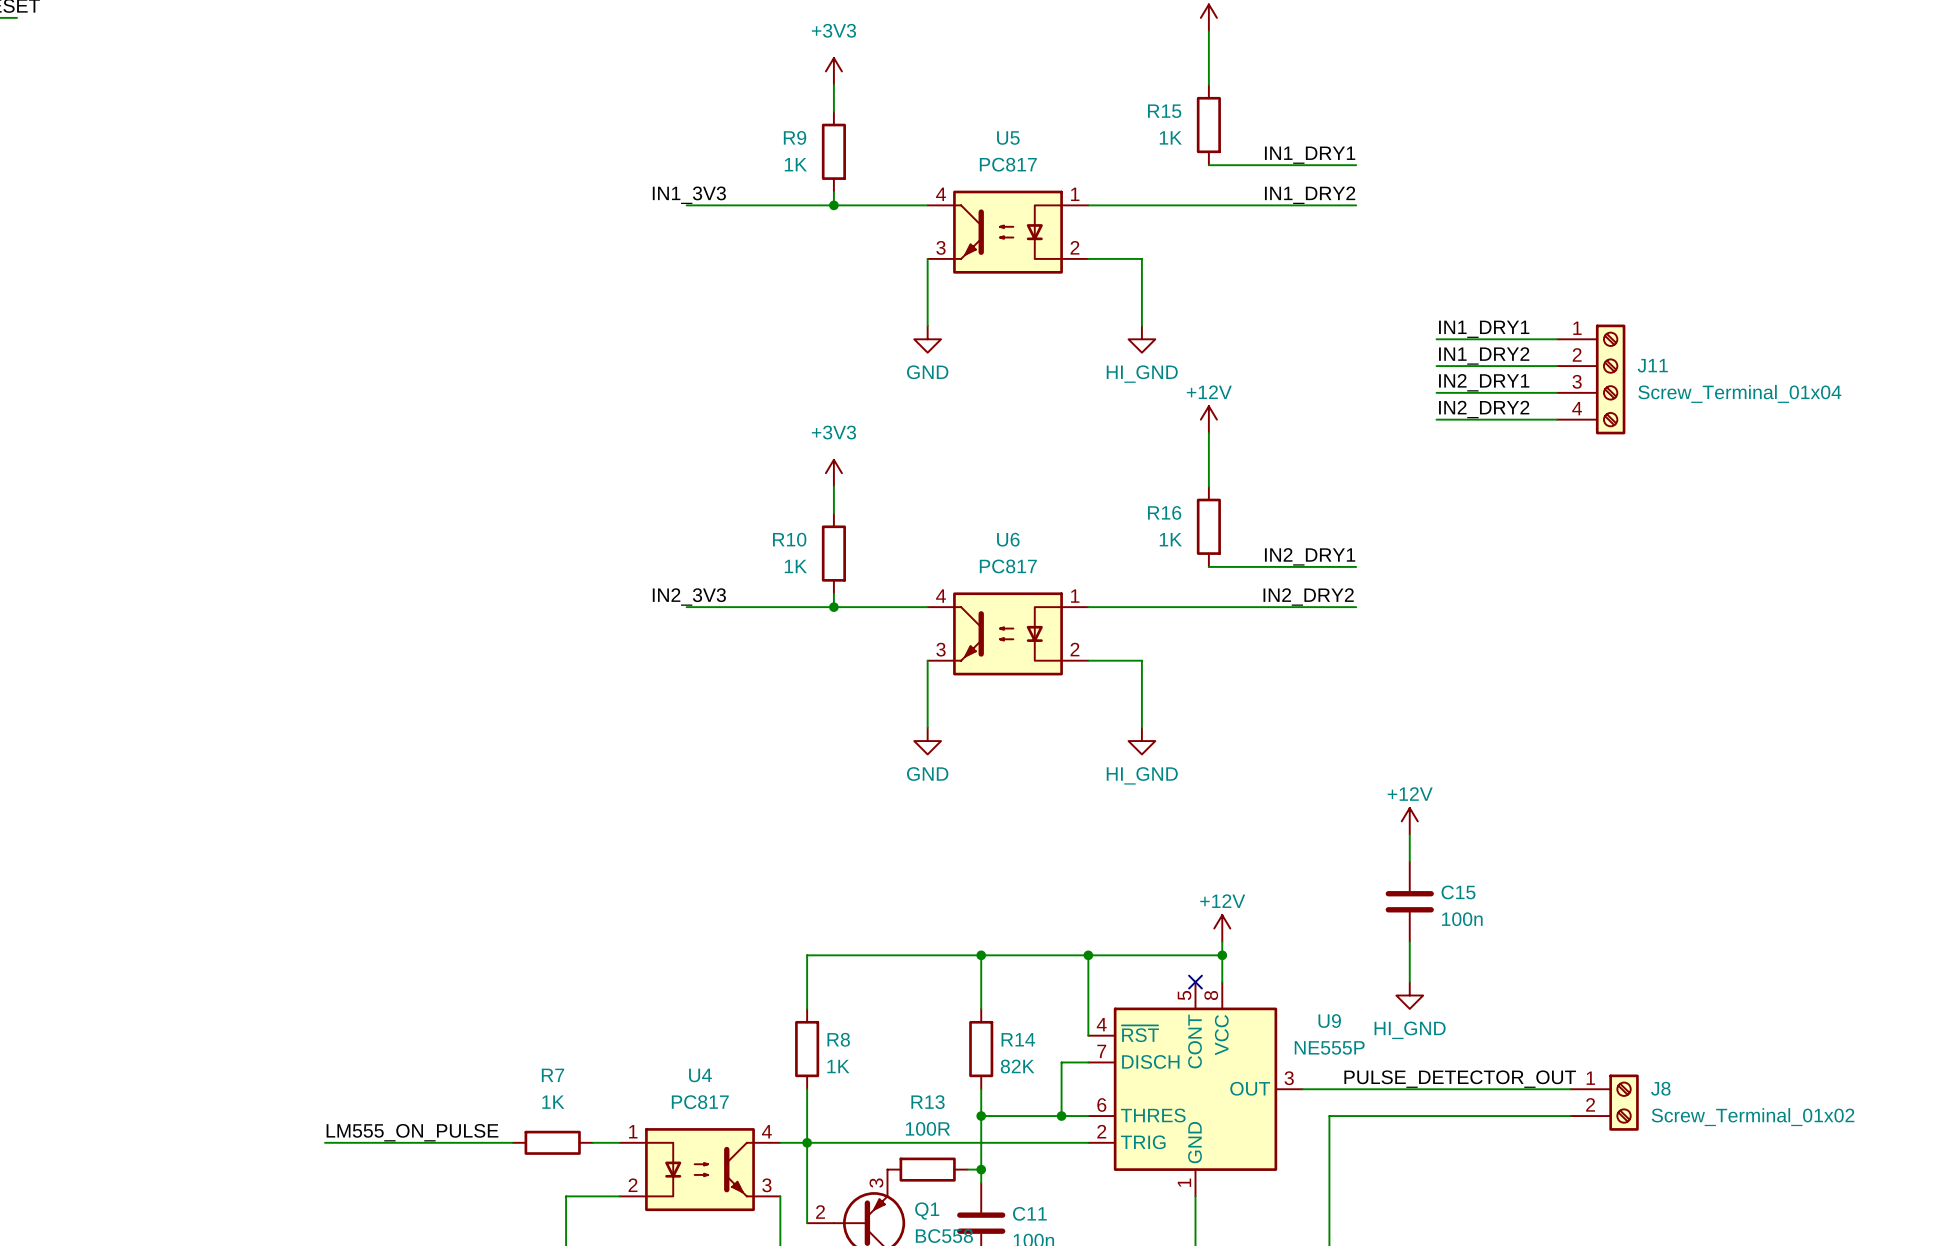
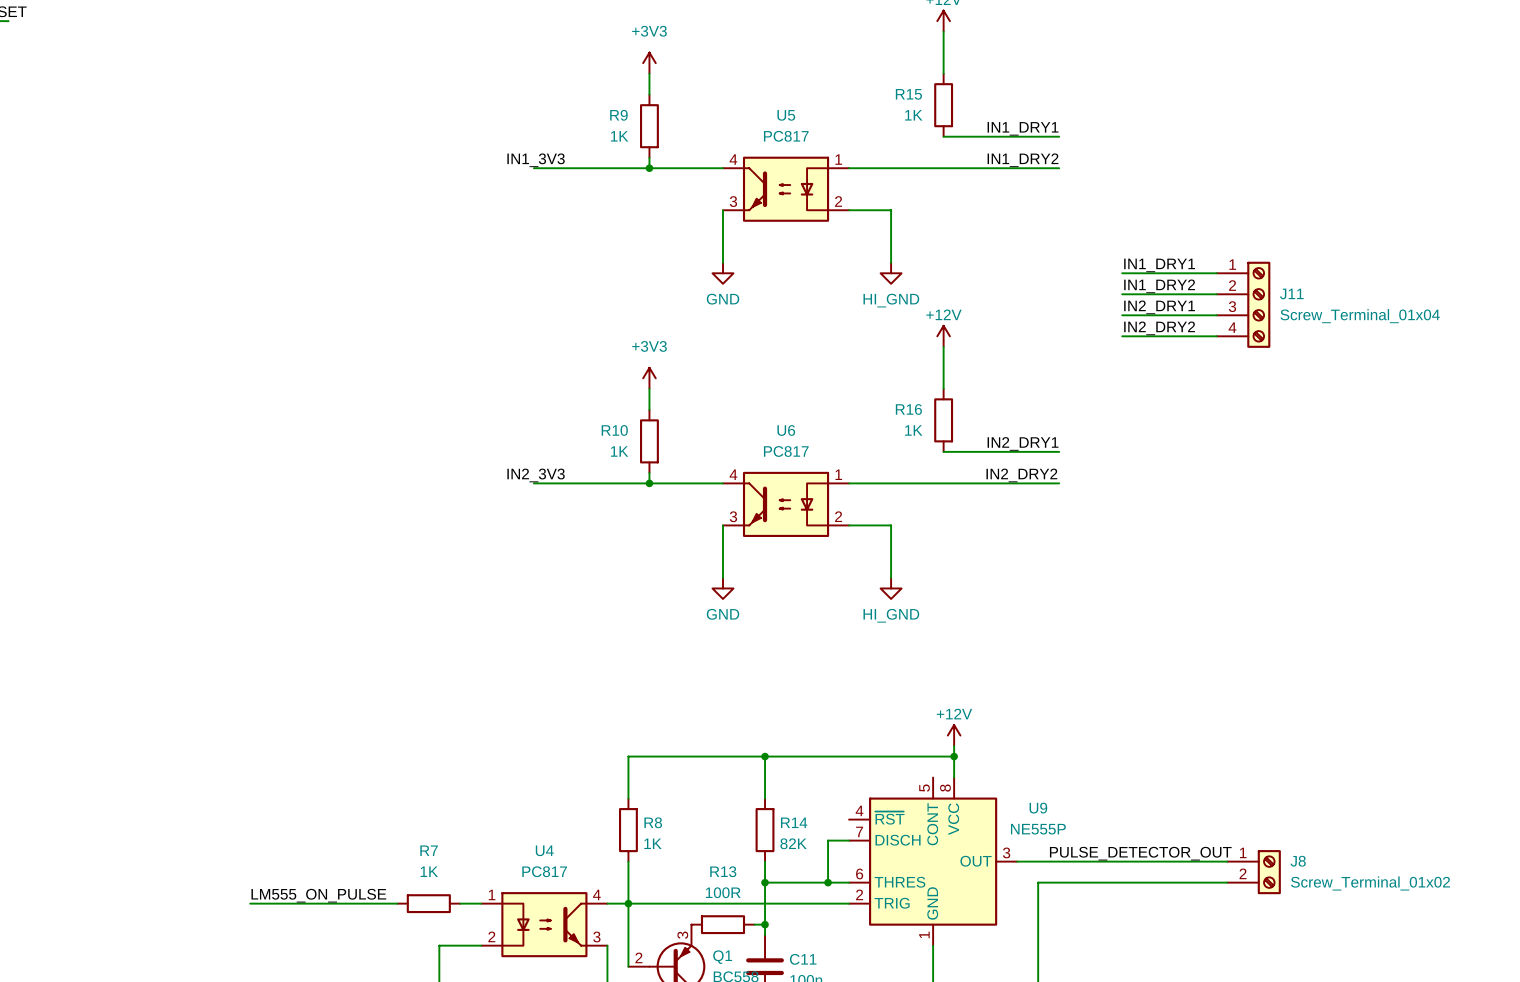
power symbol: +12V (1409, 821) -> none
wire: (1409, 834) (1409, 861) -> none
C15: 100n (1409, 901) -> none
wire: (1409, 941) (1409, 982) -> none
wire: (1088, 955) (1088, 1035) -> none
junction: (1088, 955) -> none
no-connect mark: (1195, 982) -> none
power symbol: HI_GND (1409, 995) -> none

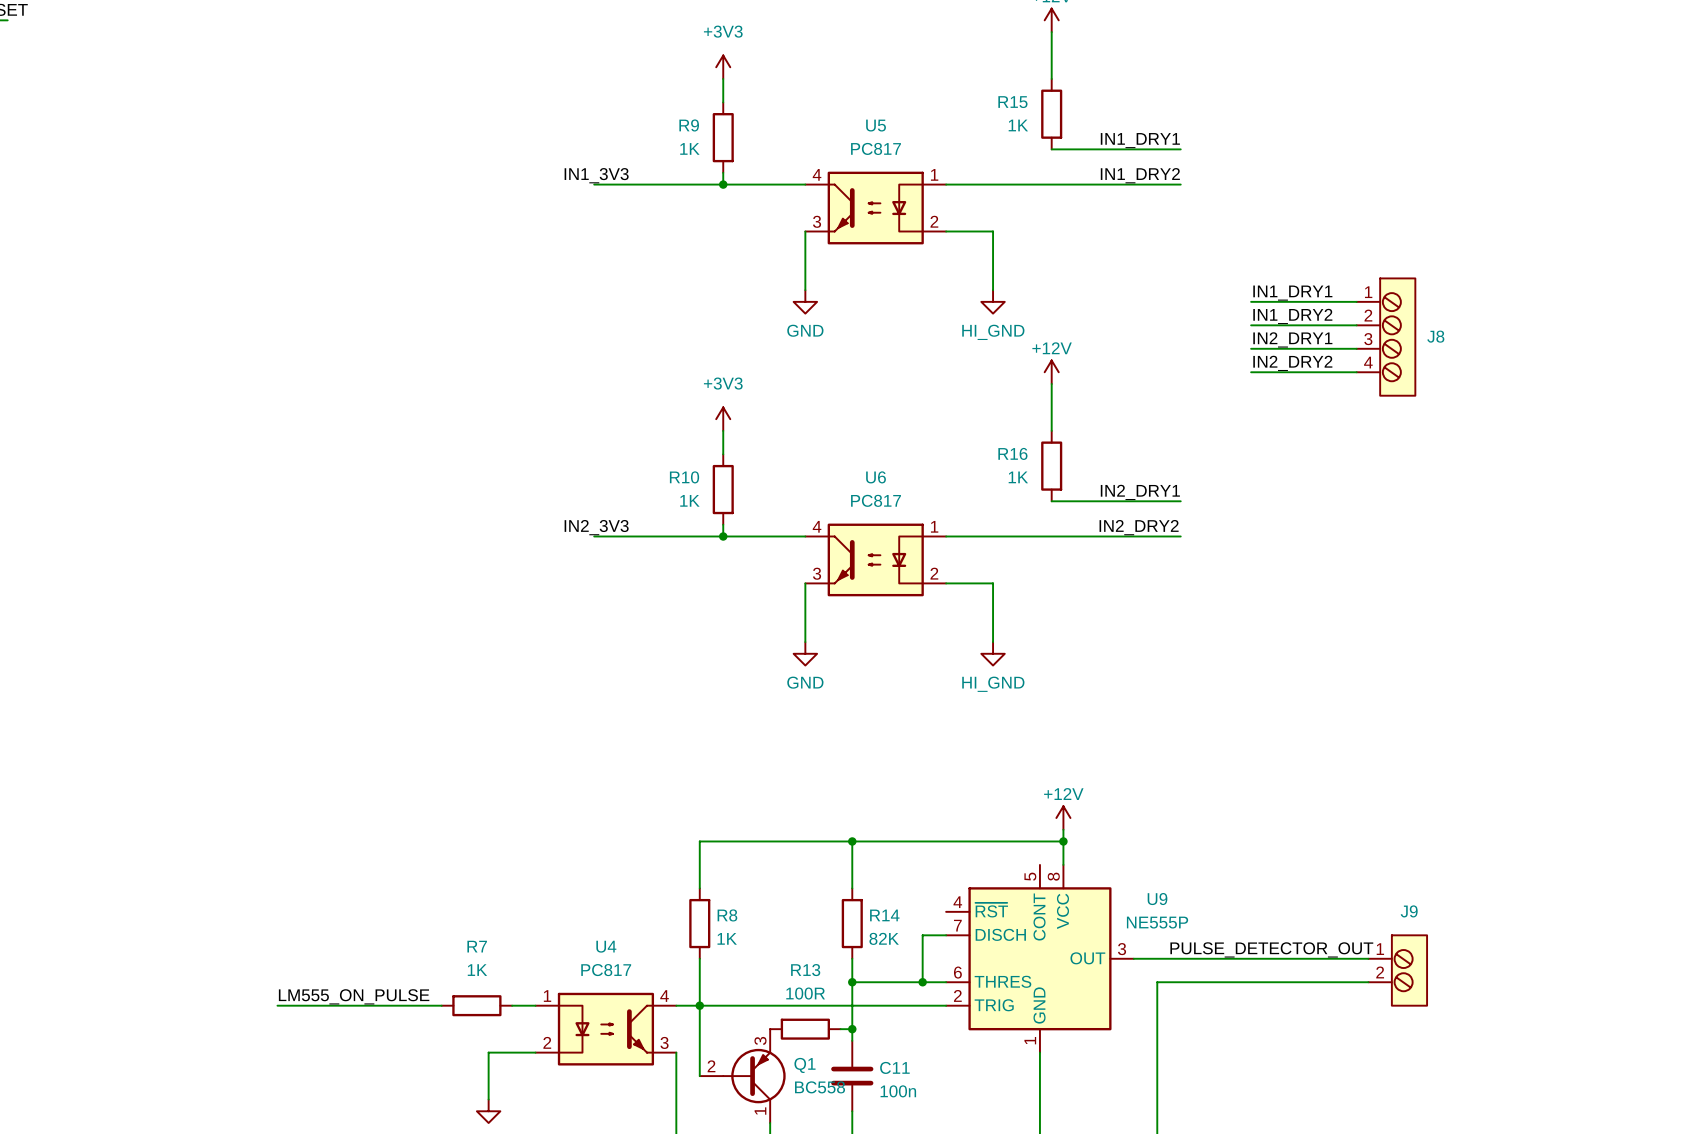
J11: Screw_Terminal_01x04 (1243, 304) -> none
J8 symbol: [1227, 850, 1281, 895] -> [1356, 278, 1416, 396]
J9: none -> (1397, 970)
J8 value: Screw_Terminal_01x02 (1370, 883) -> none

